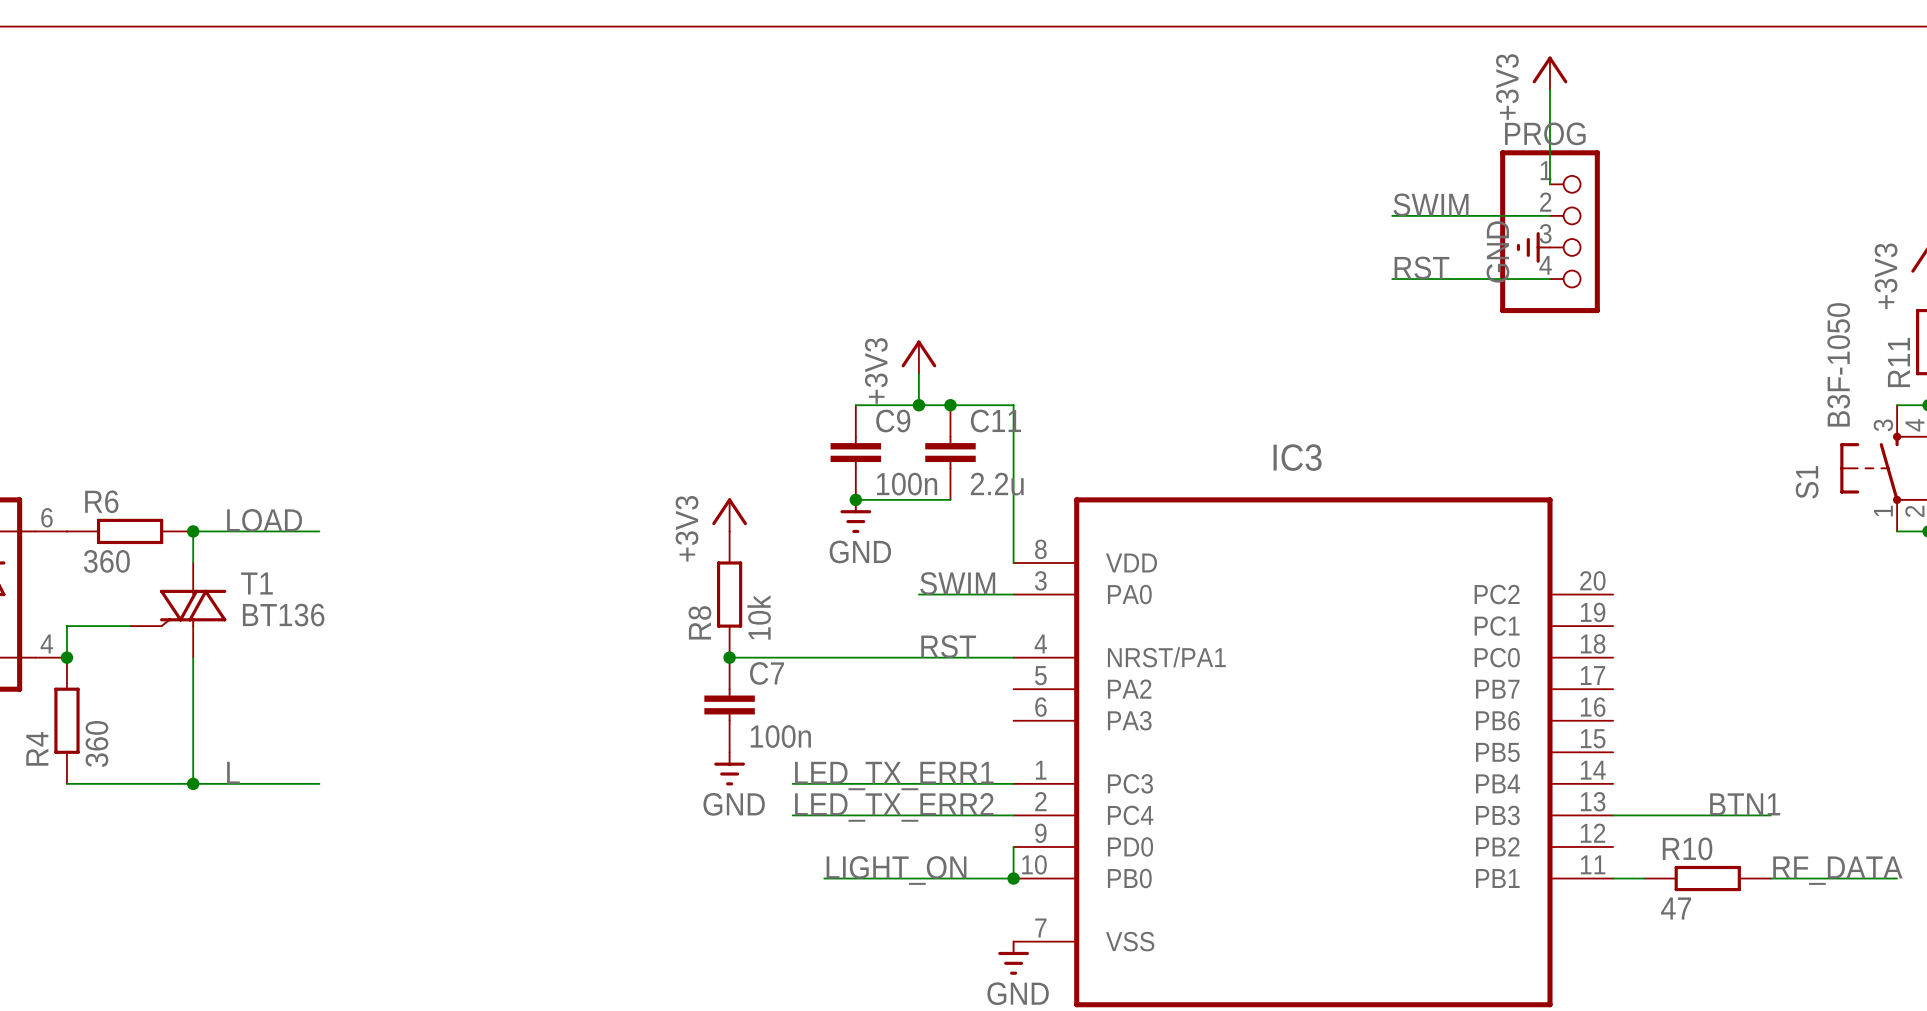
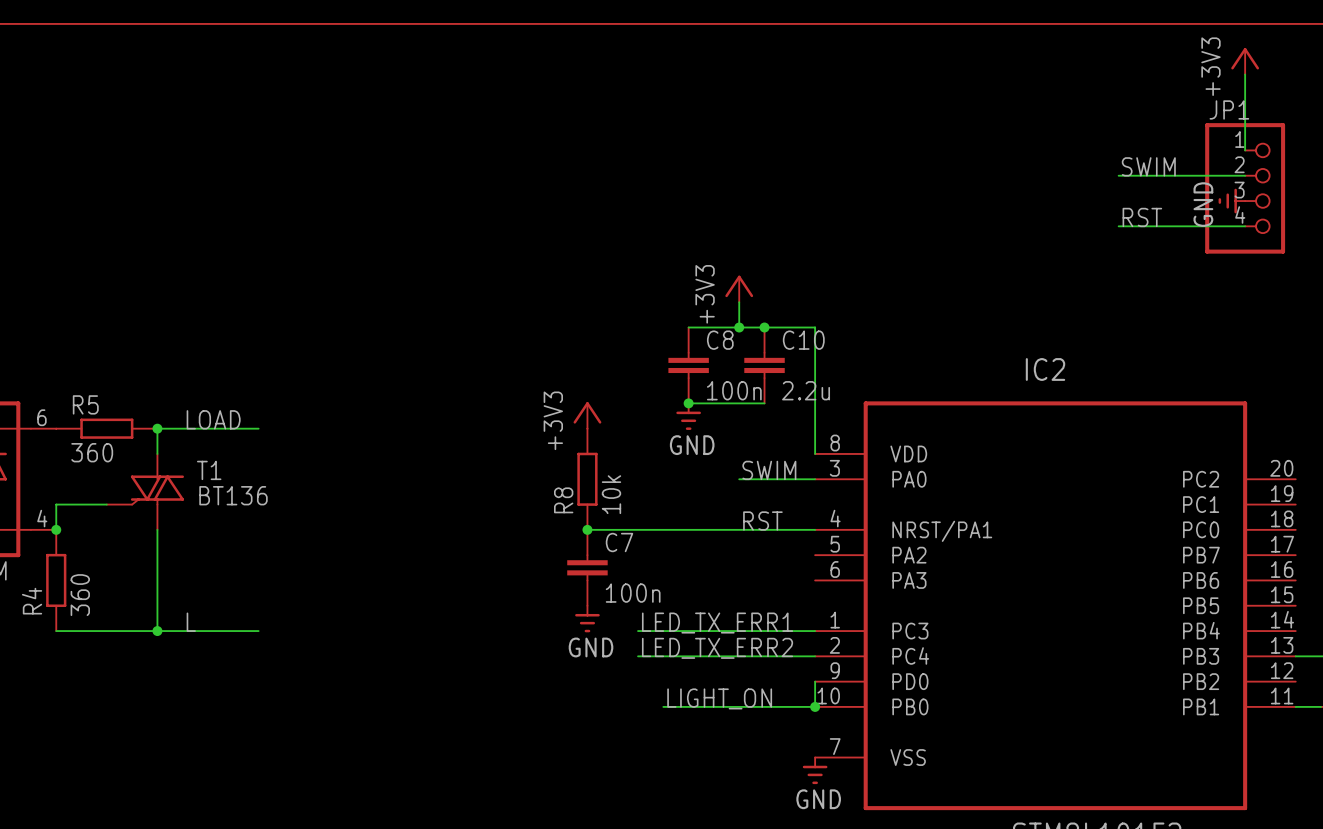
PROG name: PROG (1545, 133) -> JP1 (1229, 109)
C9 name: C9 (893, 420) -> C8 (720, 340)
C11 name: C11 (995, 420) -> C10 (803, 340)
IC3 name: IC3 (1297, 457) -> IC2 (1045, 369)
R6 name: R6 (101, 501) -> R5 (85, 404)

